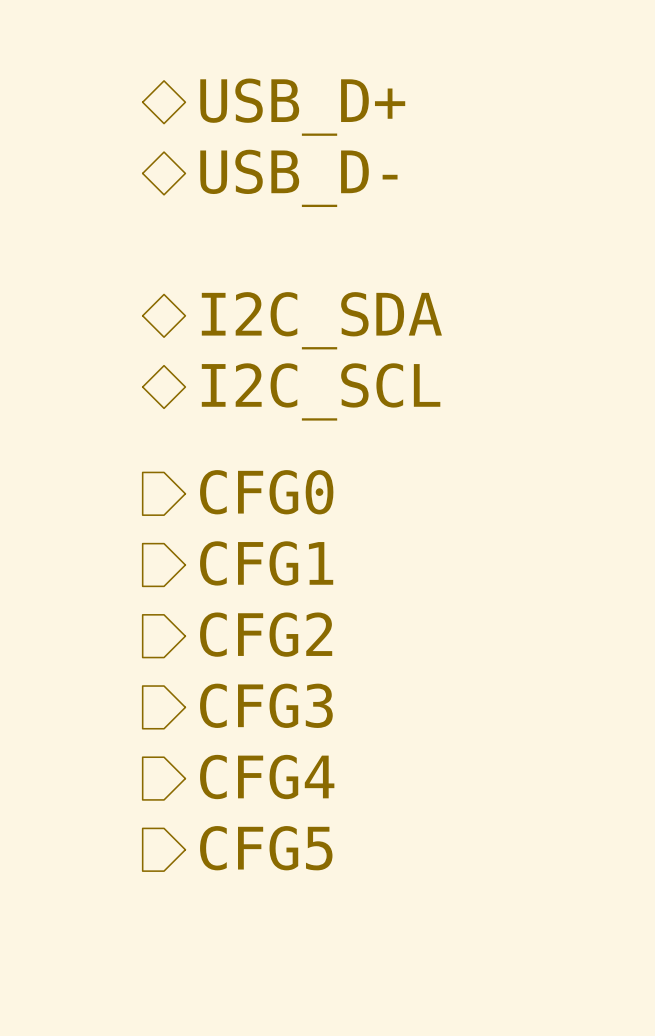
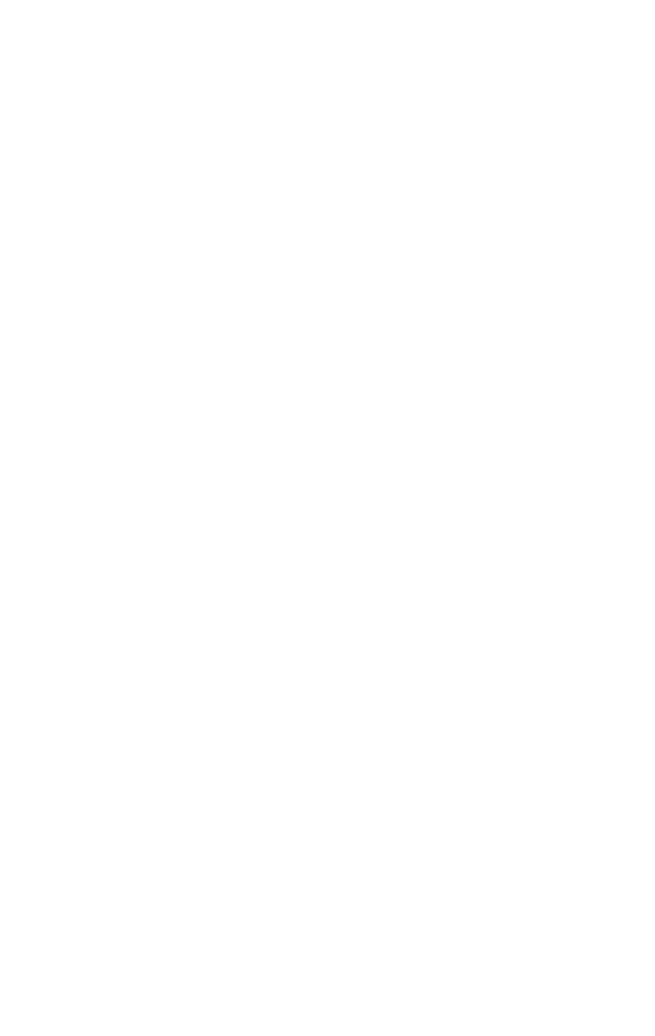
hierarchical label: USB_D+ (302, 107) -> none
hierarchical label: USB_D- (298, 178) -> none
hierarchical label: I2C_SDA (321, 320) -> none
hierarchical label: I2C_SCL (321, 391) -> none
hierarchical label: CFG0 (266, 492) -> none
hierarchical label: CFG1 (266, 563) -> none
hierarchical label: CFG2 (266, 634) -> none
hierarchical label: CFG3 (266, 705) -> none
hierarchical label: CFG4 (267, 777) -> none
hierarchical label: CFG5 (266, 848) -> none

